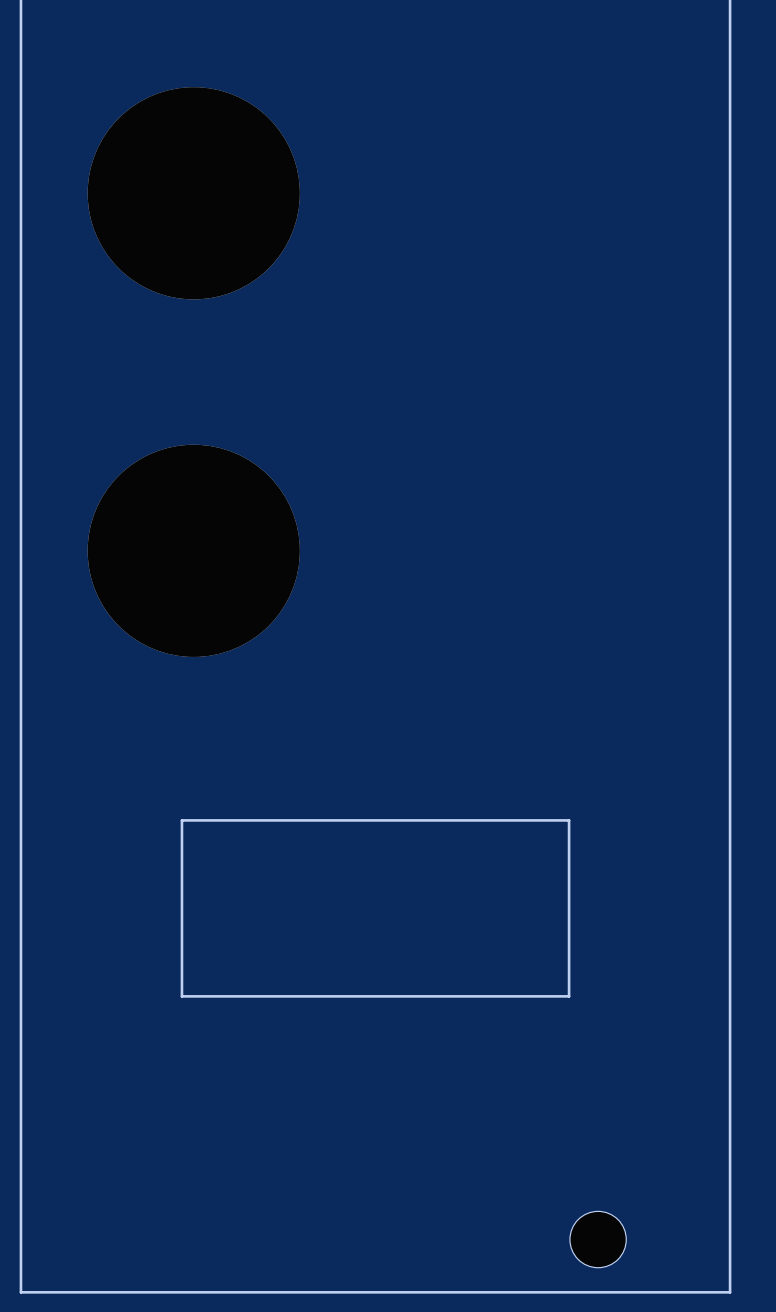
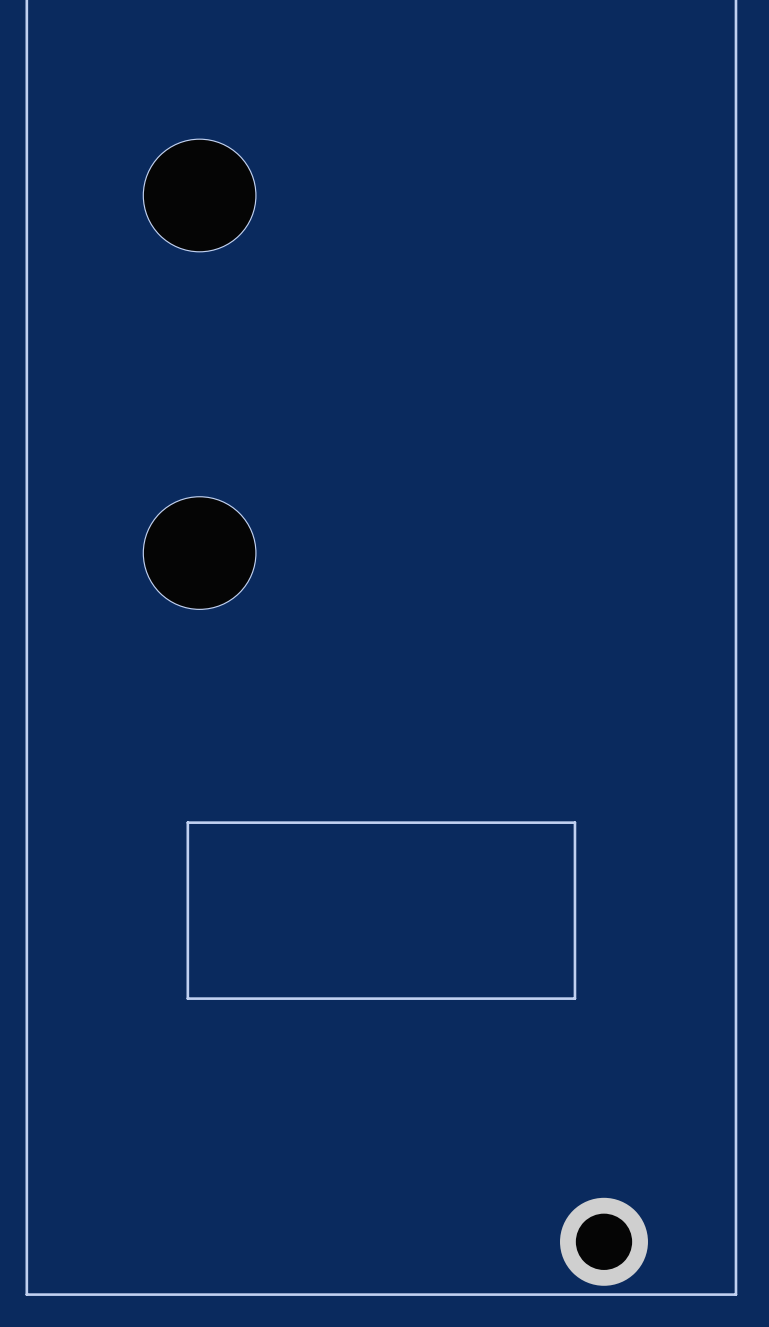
part footprint: [87, 87, 300, 300] -> [143, 139, 256, 252]
part footprint: [87, 444, 300, 657] -> [143, 496, 256, 610]
part footprint: [569, 1211, 627, 1268] -> [560, 1197, 648, 1286]

